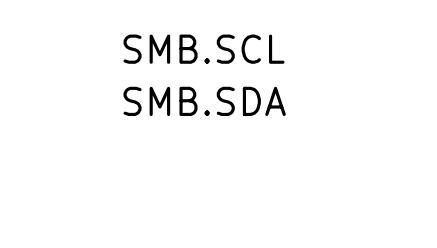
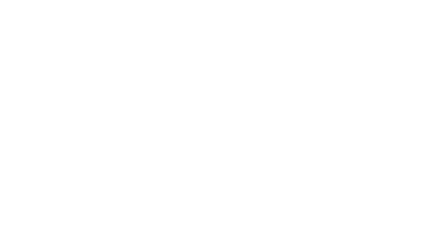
label: SMB.SCL (204, 49) -> none
label: SMB.SDA (204, 101) -> none

